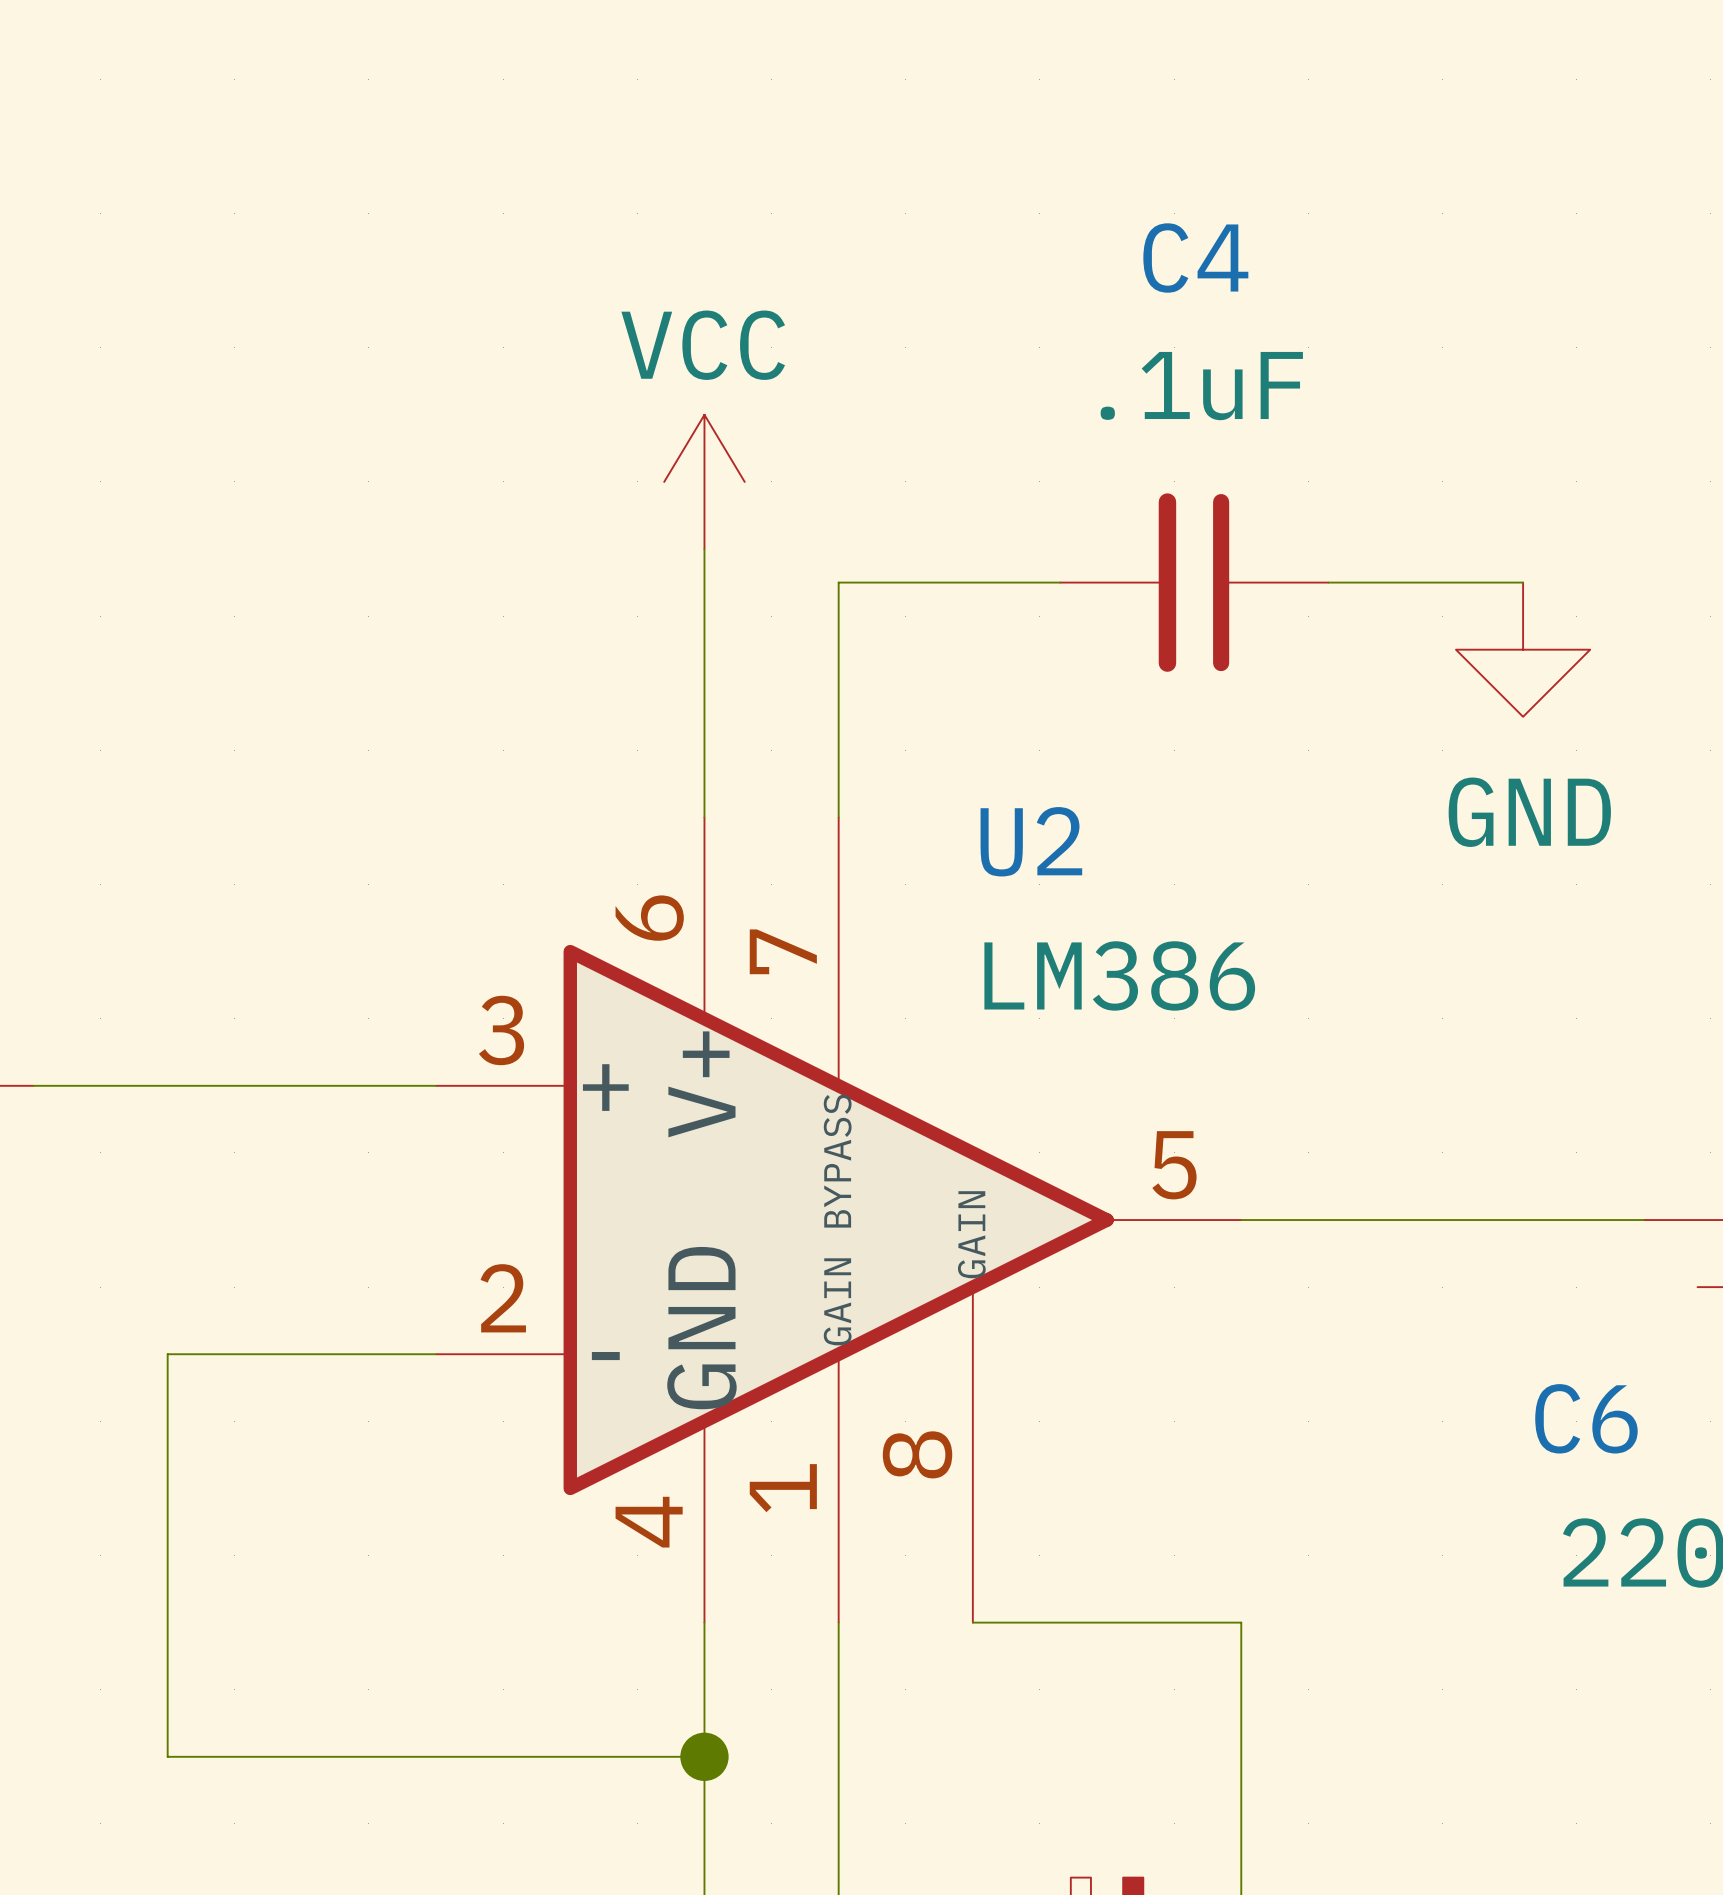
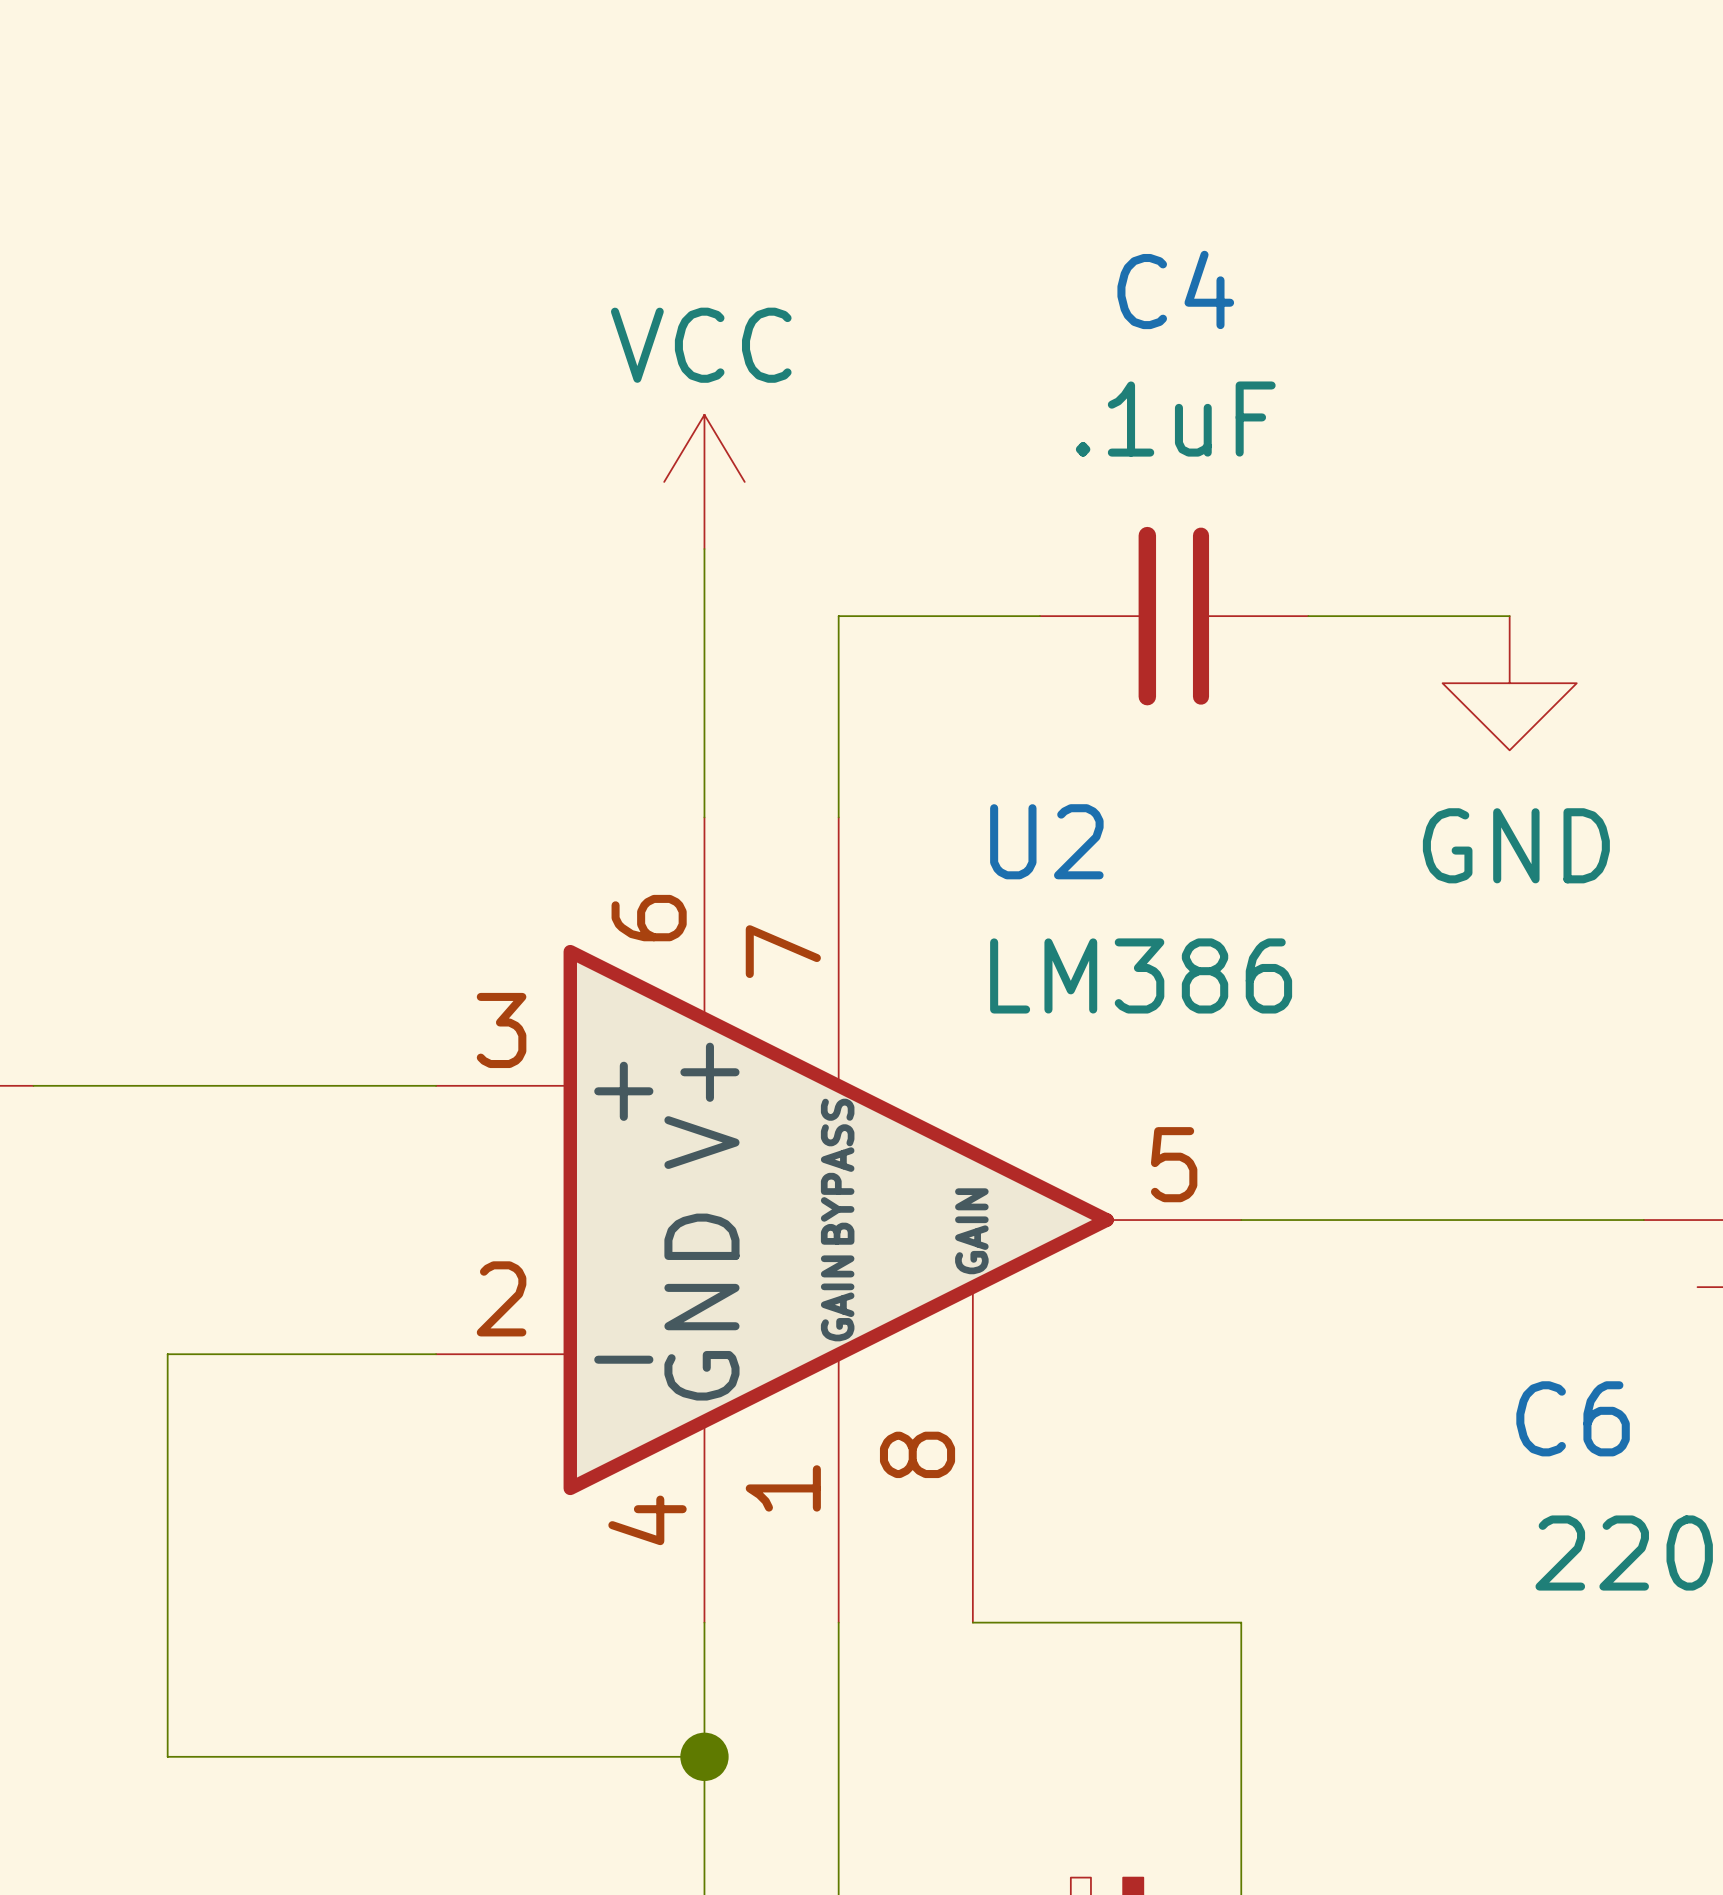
wire: (1060, 582) (838, 582) (838, 616) -> (1039, 616) (838, 616)
C4 position: (1194, 582) -> (1174, 616)
wire: (1328, 582) (1523, 582) -> none
wire: none -> (1308, 616) (1509, 616)
power symbol position: GND (1523, 649) -> GND (1509, 683)

